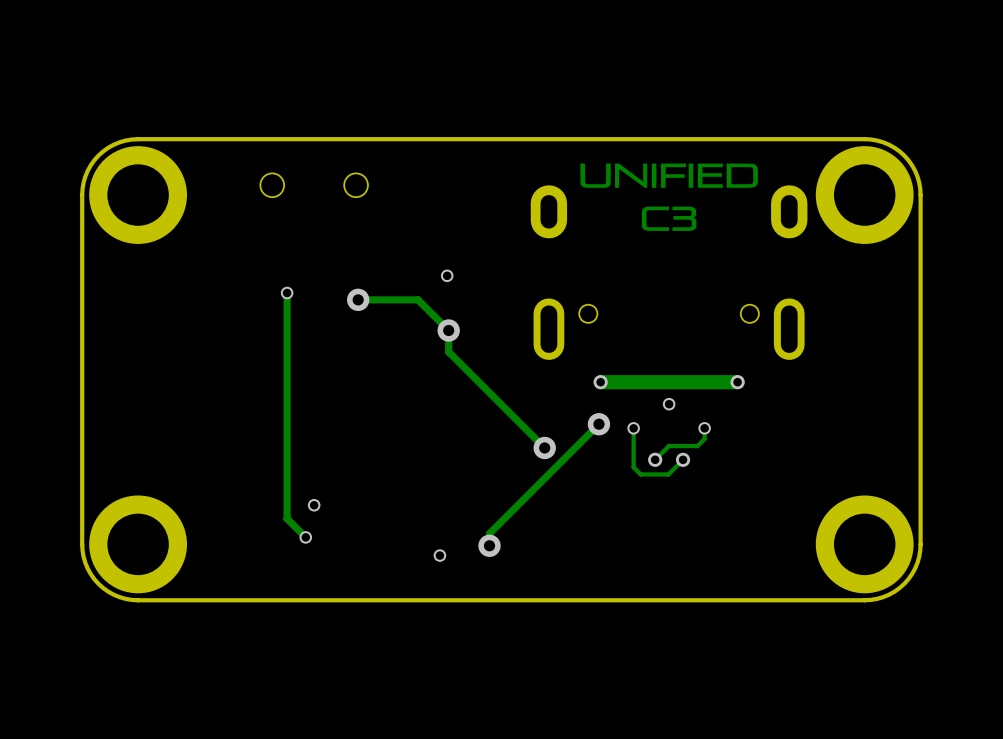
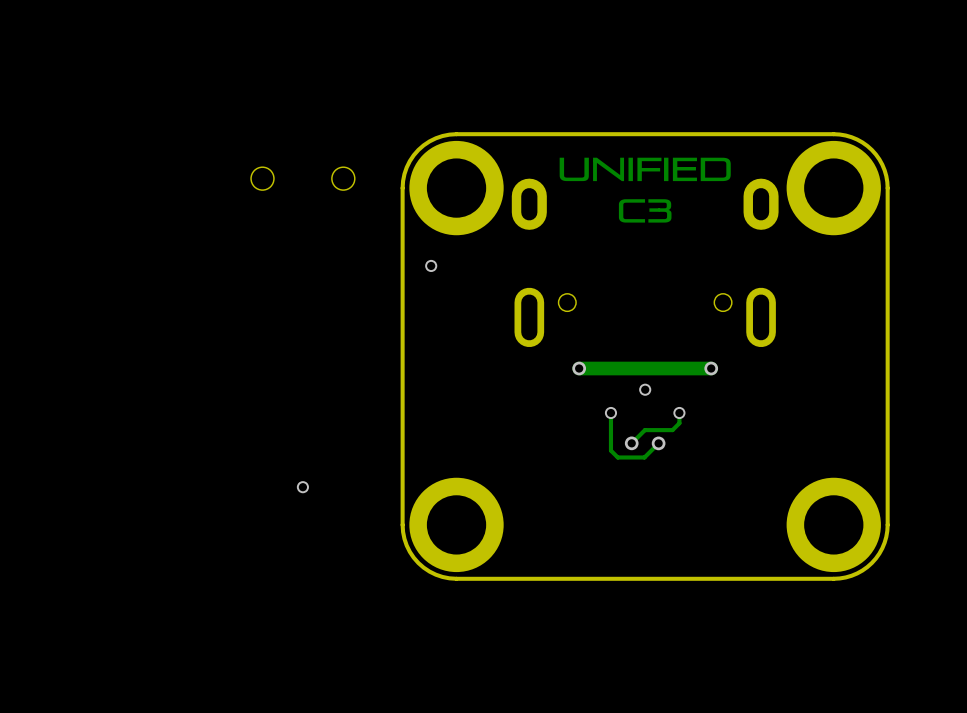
board edge: (473, 139) (131, 139) (113, 144) (98, 155) (87, 170) (82, 195) (82, 544) (85, 562) (98, 583) (119, 597) (138, 600) (473, 600) -> (456, 134) (435, 138) (418, 149) (406, 167) (402, 188) (403, 531) (409, 551) (423, 567) (435, 574) (456, 578)
part: (138, 195) -> none
part: none -> (456, 188)
track: (287, 292) (287, 518) (305, 537) -> none
via: (287, 292) -> none
track: (358, 299) (418, 299) (448, 330) (448, 351) (544, 447) -> none
via: (358, 299) -> none
via: (448, 330) -> none
track: (598, 424) (489, 533) (489, 545) -> none
via: (598, 424) -> none
via: (544, 447) -> none
via: (305, 537) -> none
part: (138, 544) -> none
part: none -> (456, 524)
via: (489, 545) -> none
via: (439, 555) -> none

